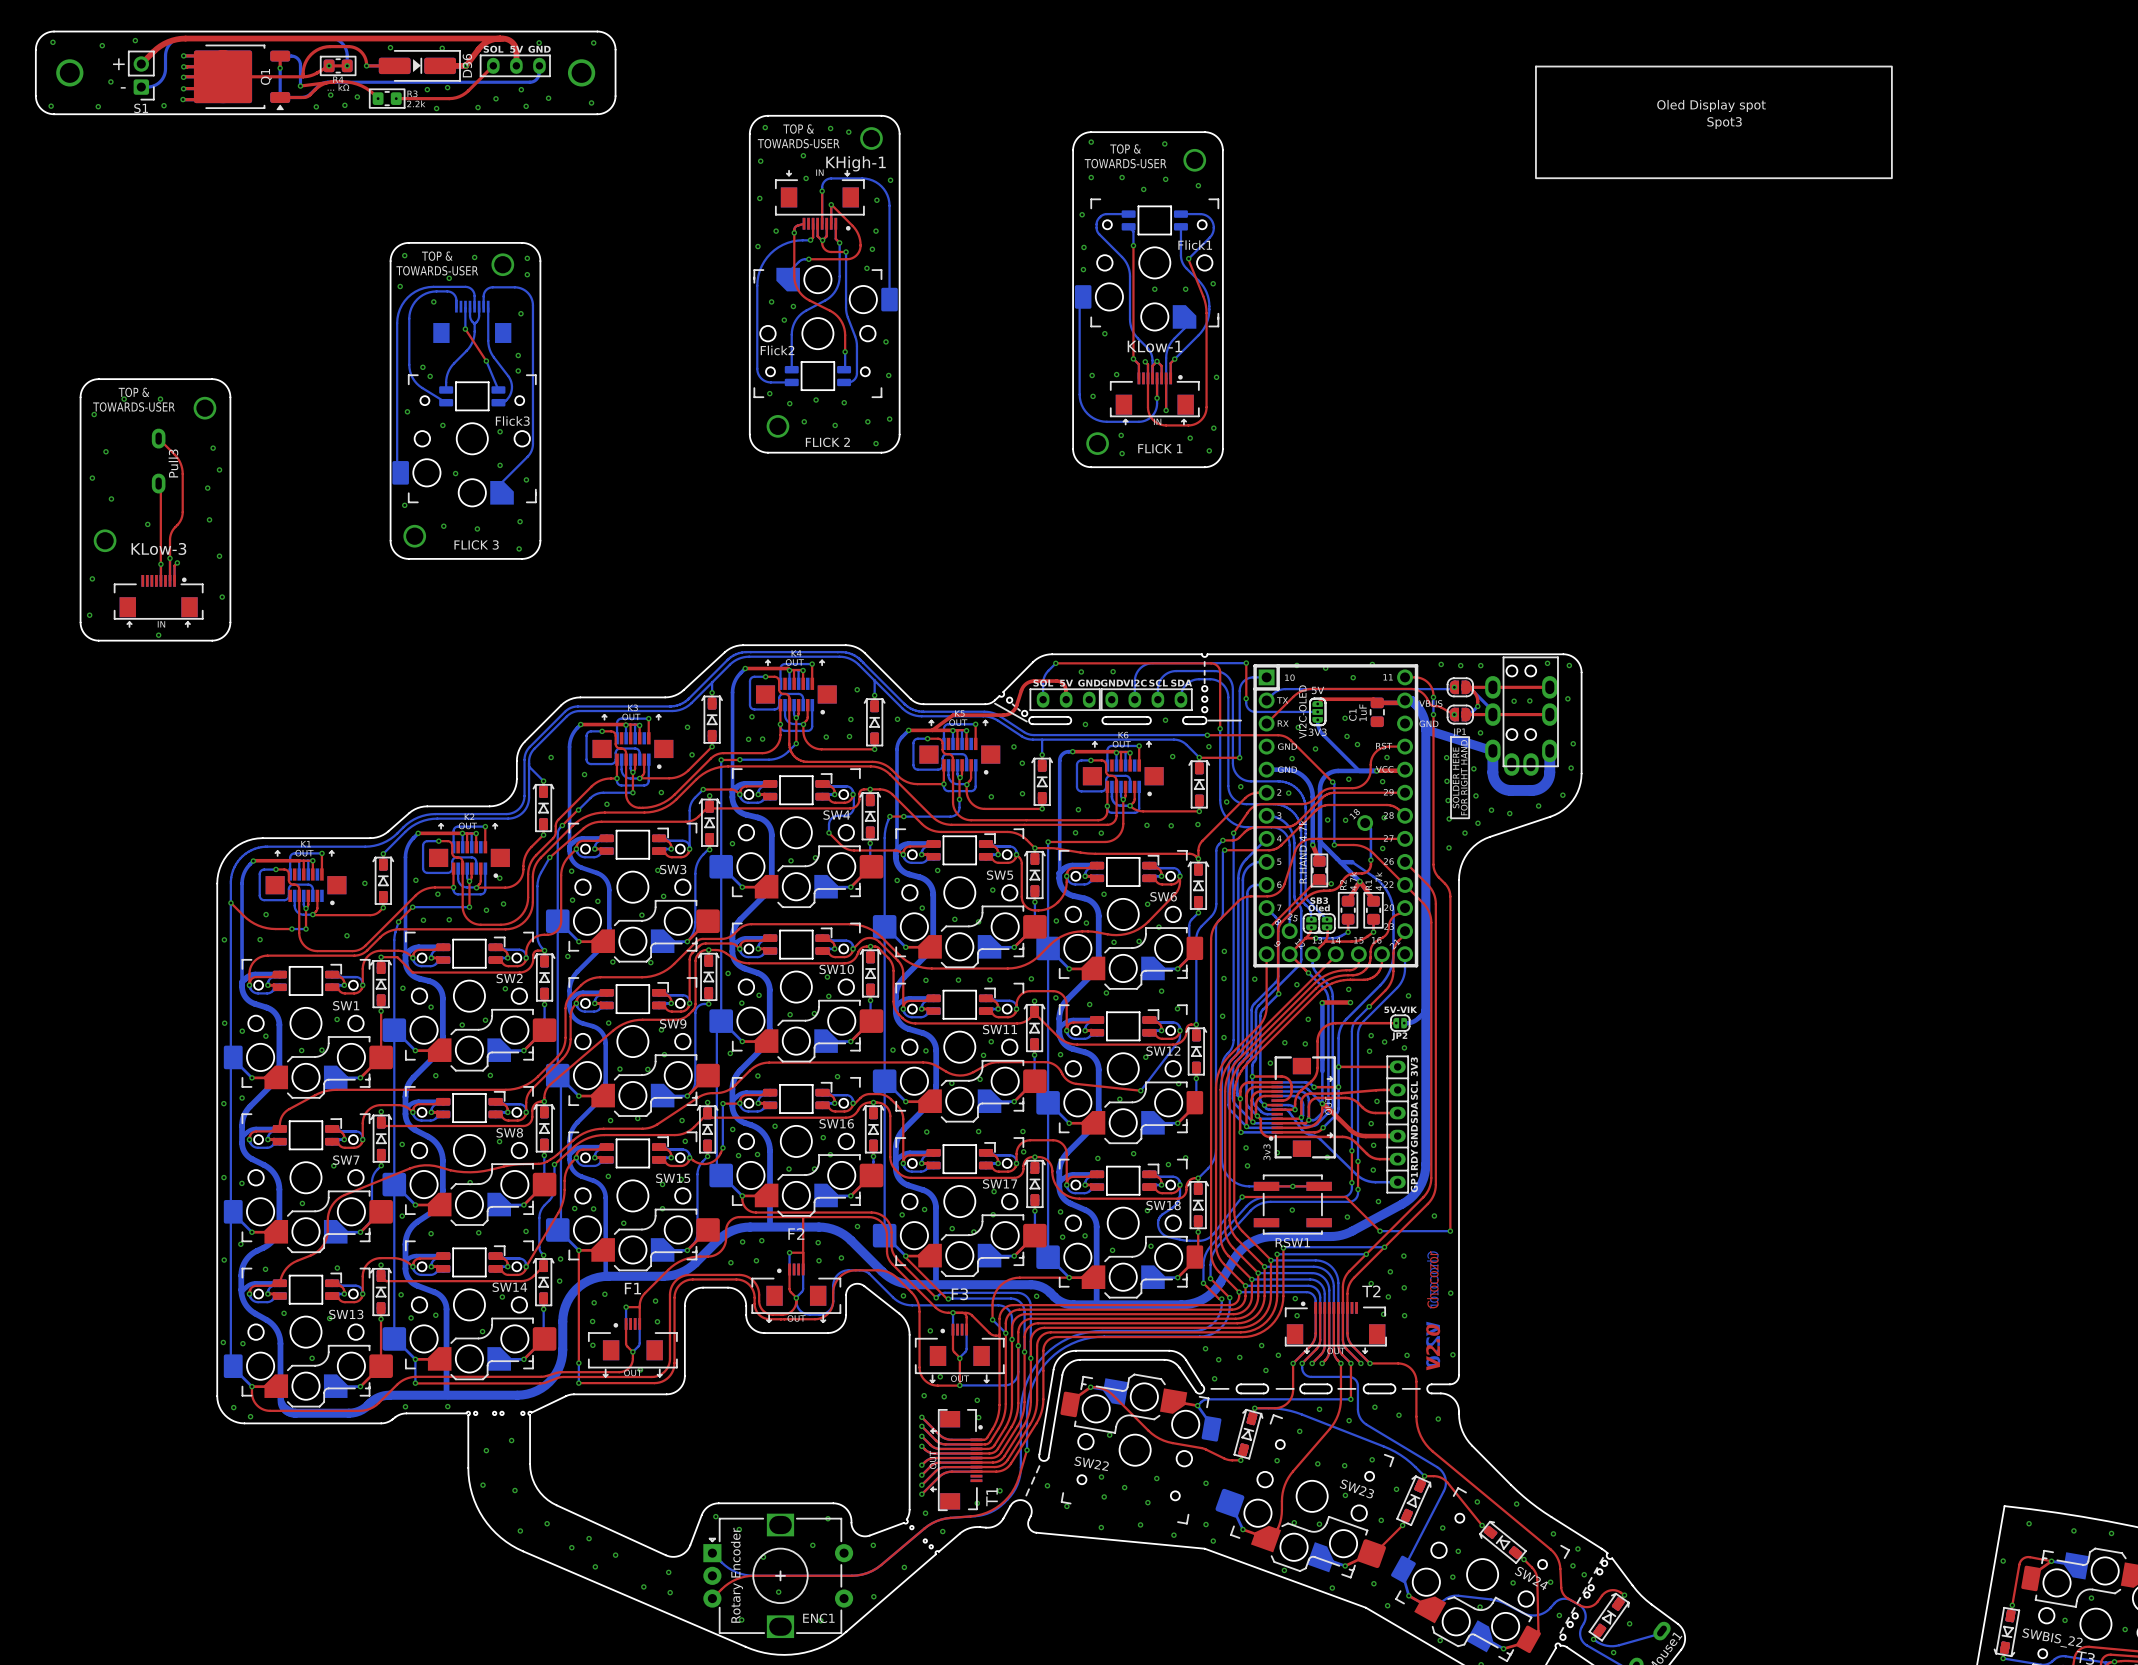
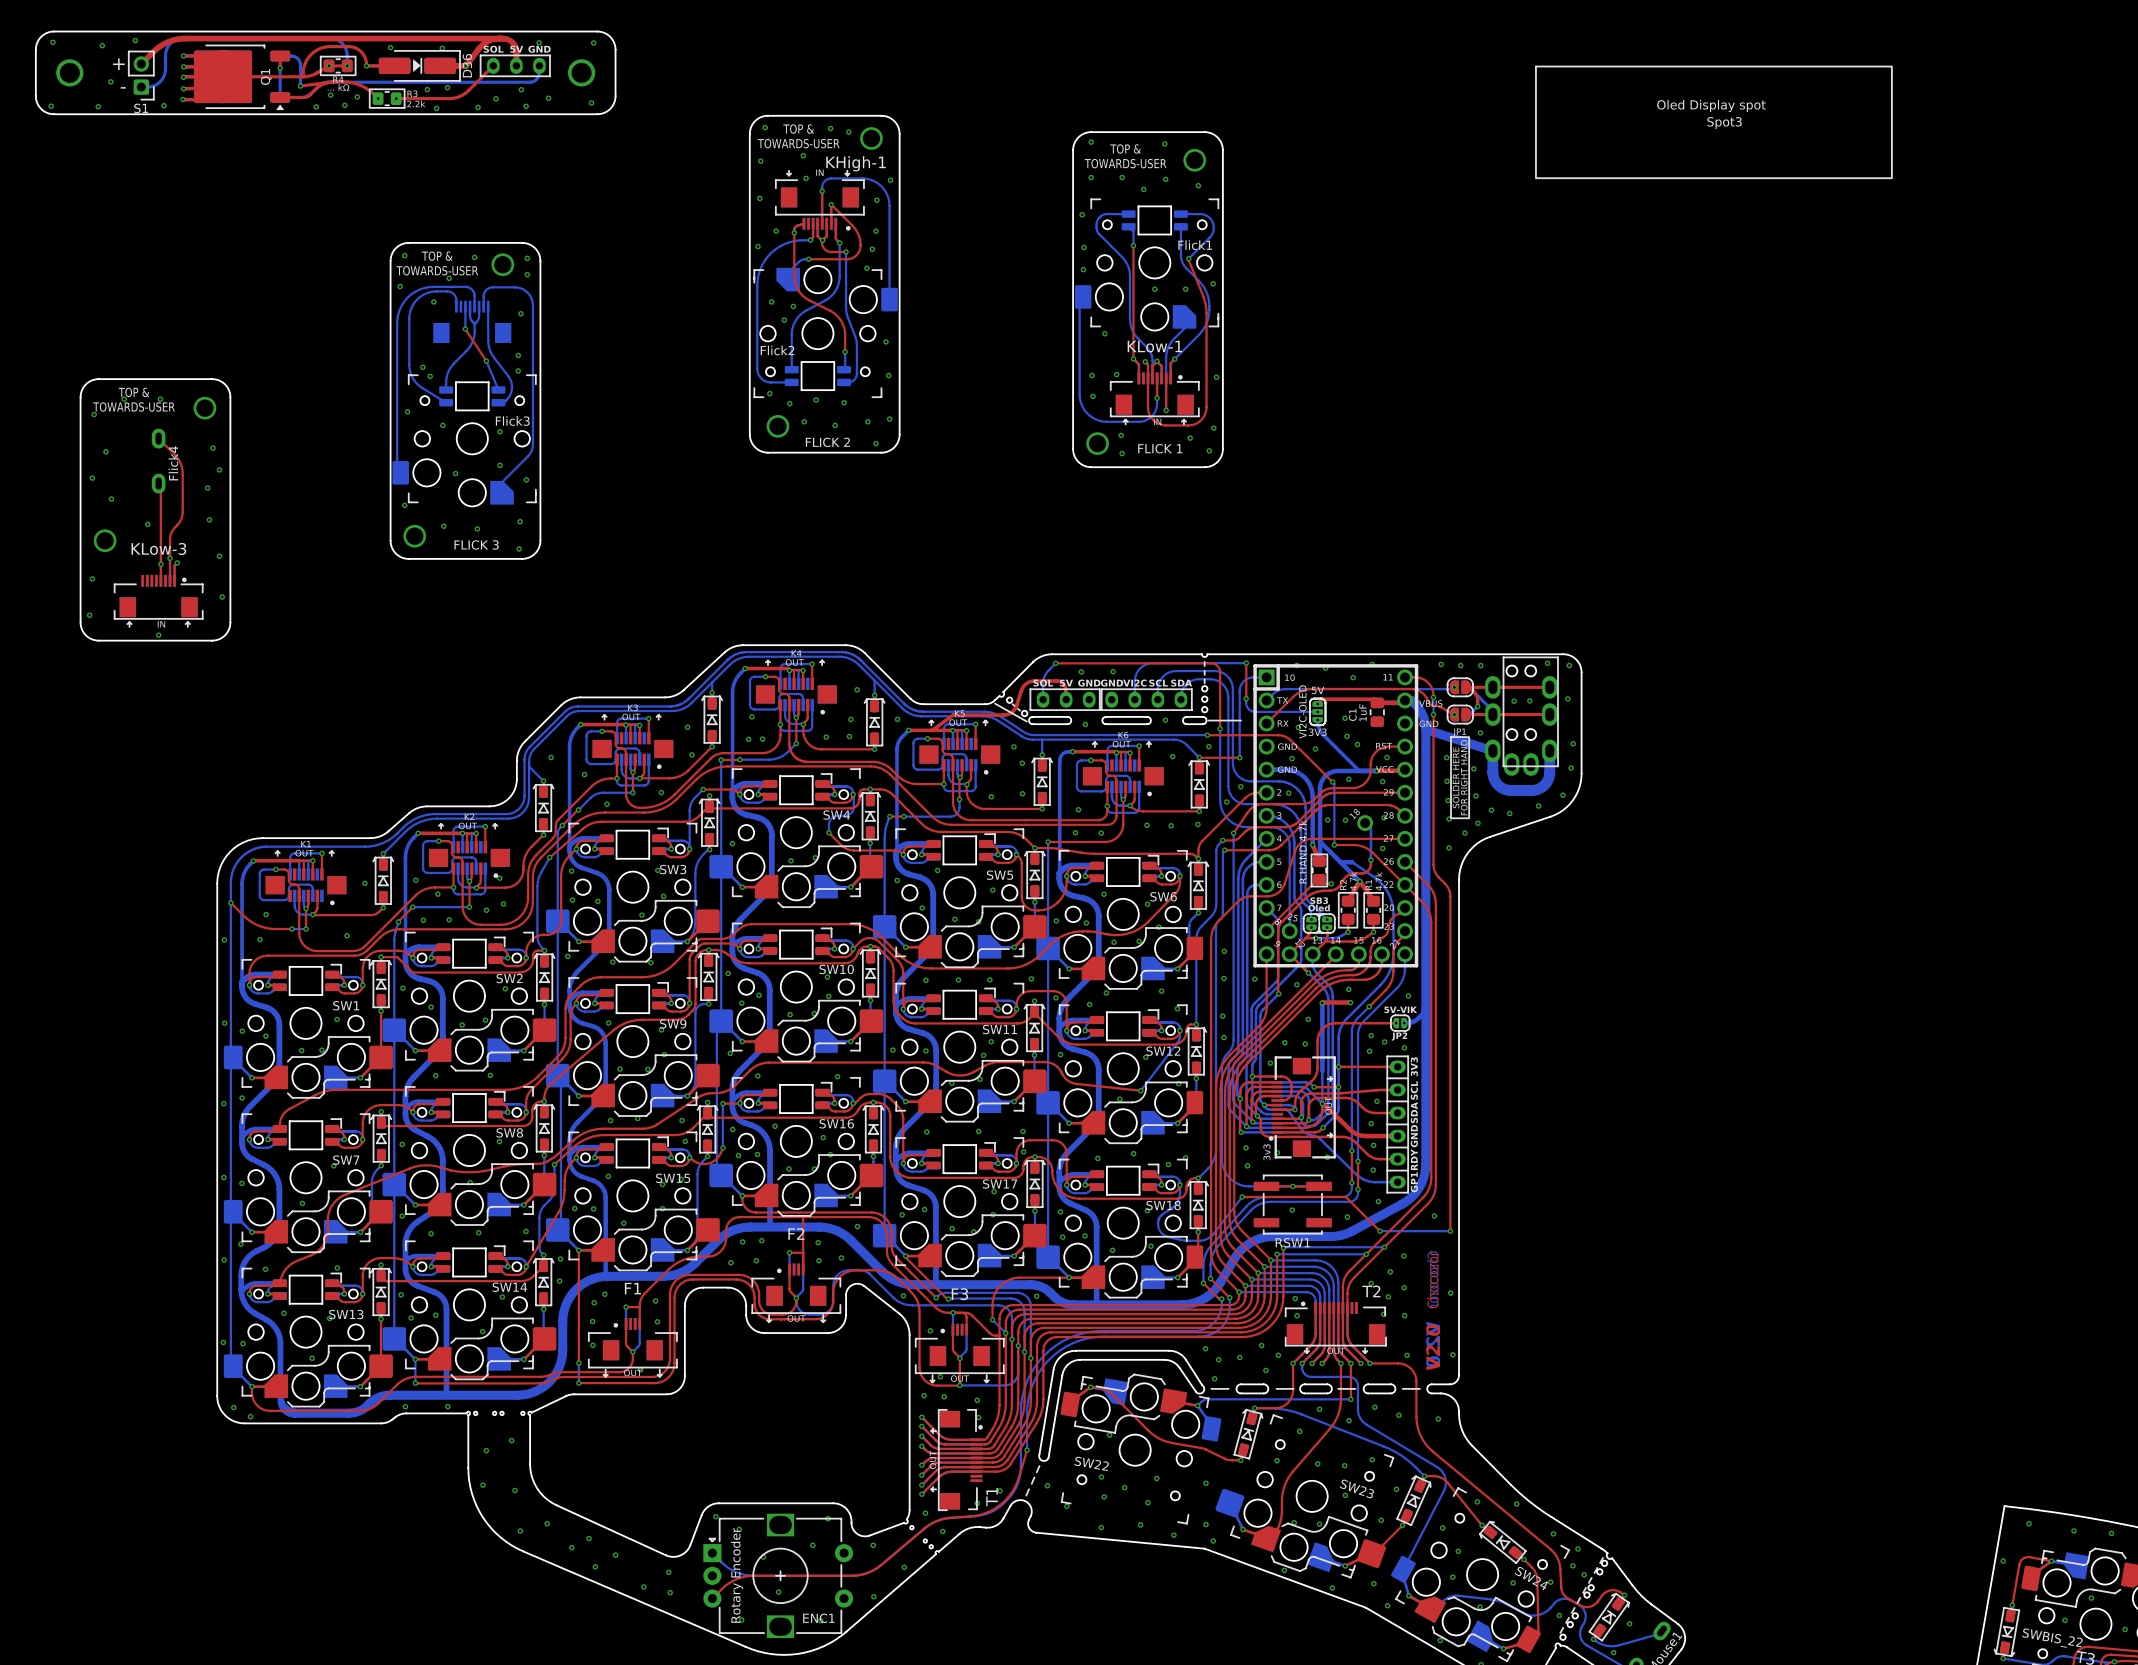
Pull3 name: Pull3 (173, 463) -> Flick4 (173, 463)

